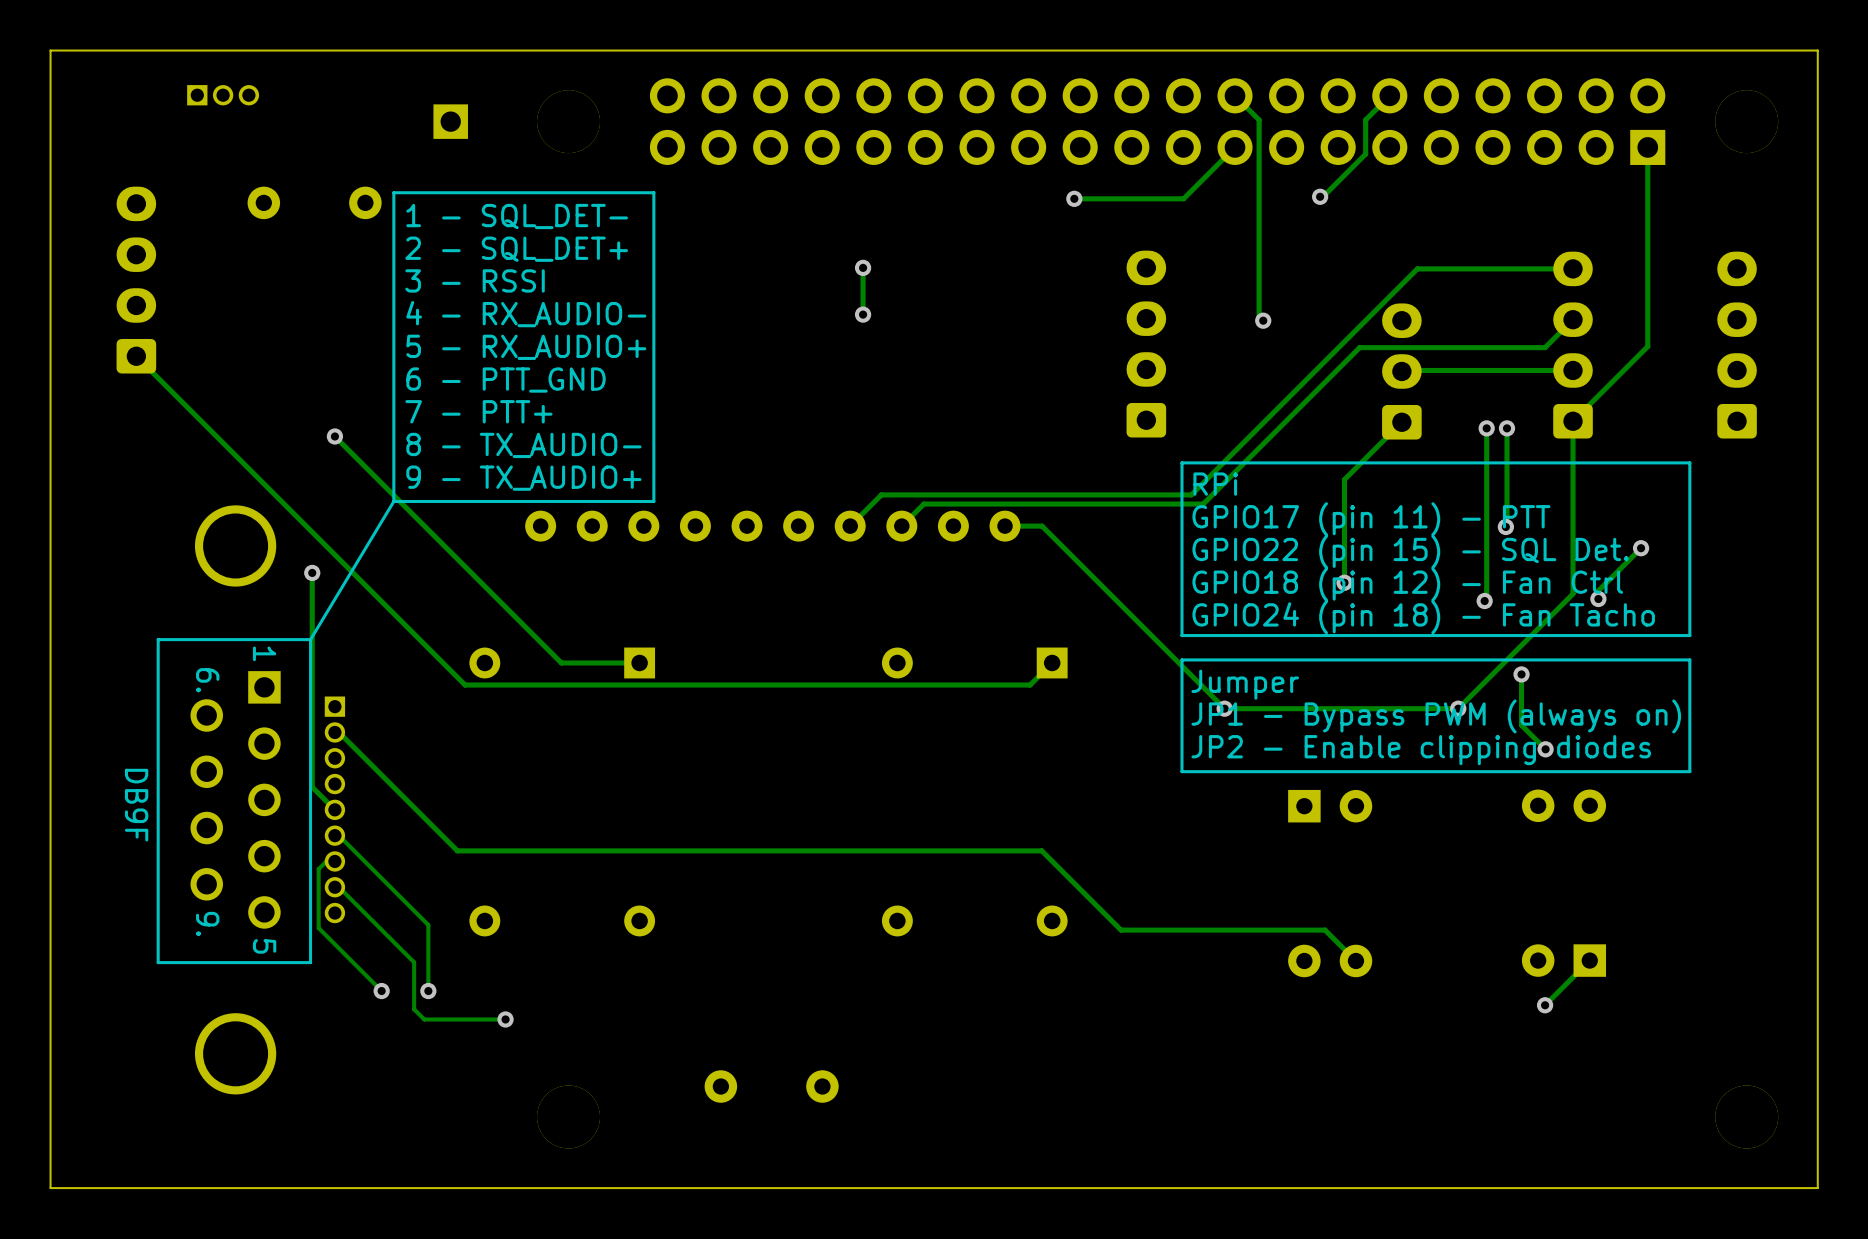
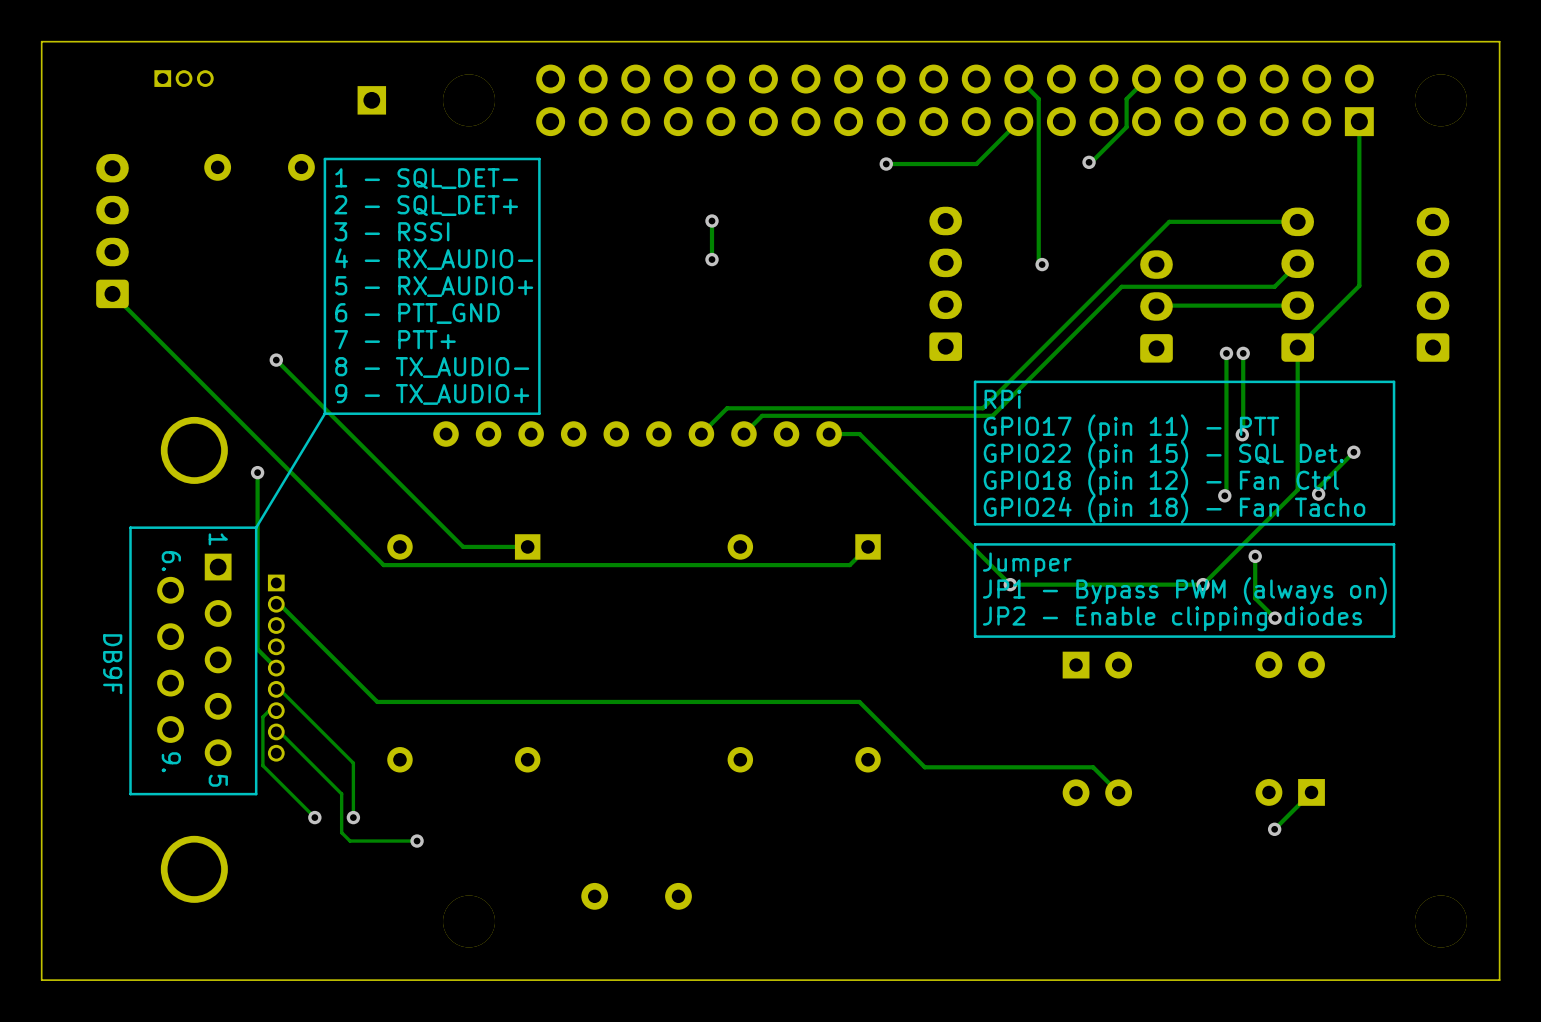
track: (1401, 422) (1344, 479) (1344, 582) -> none
via: (1344, 582) -> none

